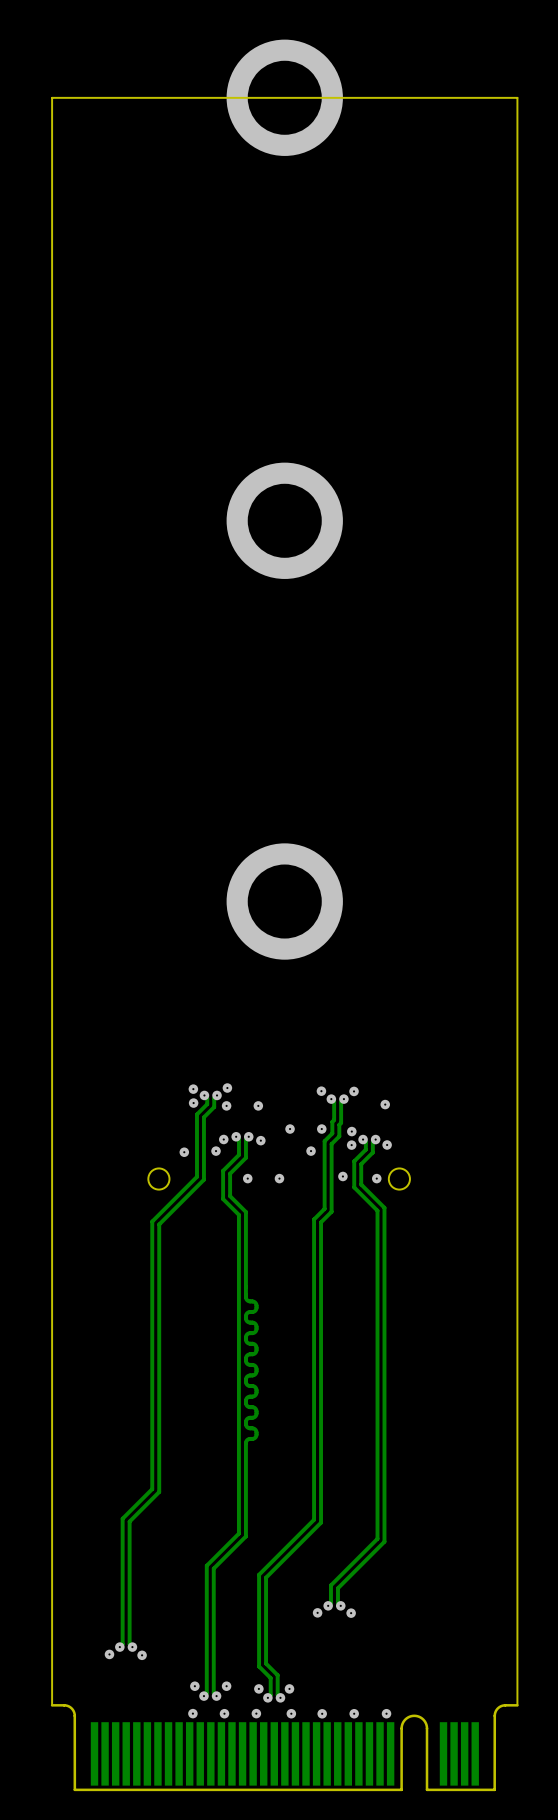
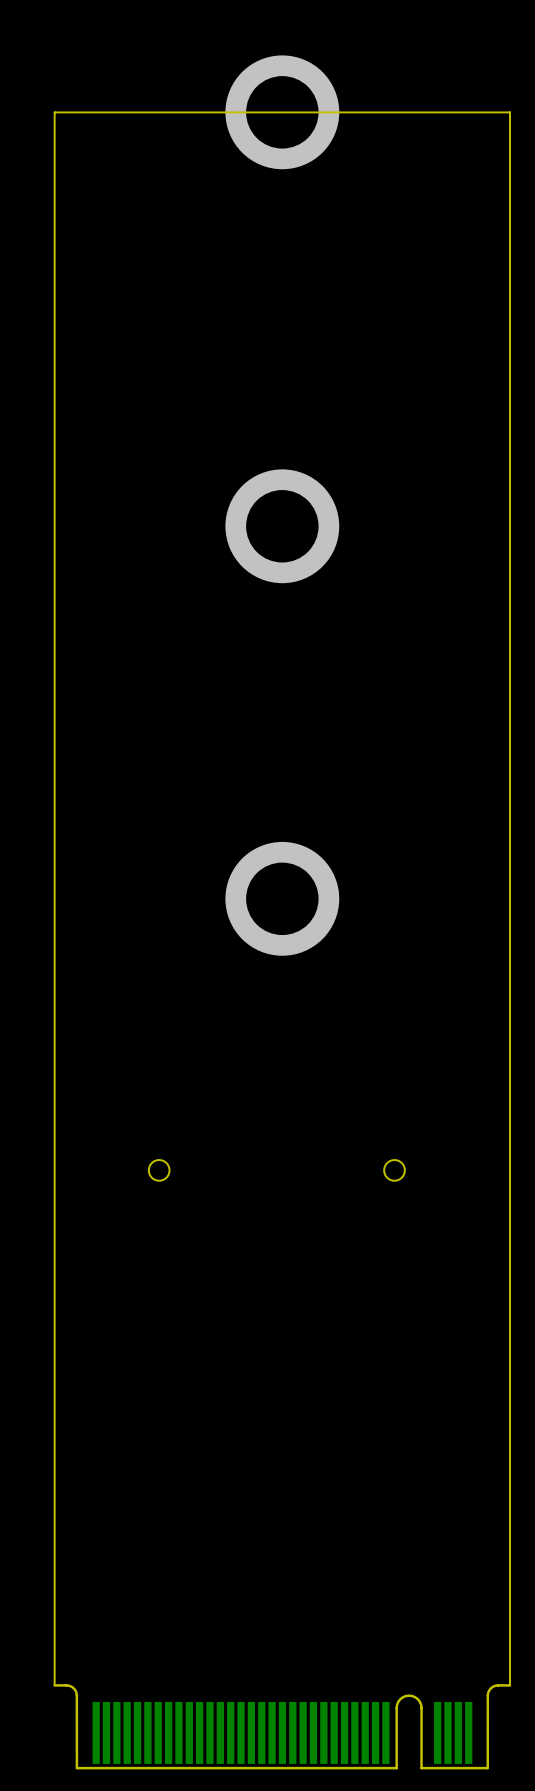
via: (227, 1088) -> none
via: (193, 1089) -> none
via: (321, 1091) -> none
via: (354, 1091) -> none
track: (204, 1095) (207, 1098) (207, 1104) (196, 1114) (196, 1176) (152, 1221) (152, 1489) (122, 1518) (122, 1644) (119, 1647) -> none
via: (204, 1095) -> none
track: (217, 1095) (214, 1098) (214, 1107) (203, 1117) (203, 1179) (159, 1224) (159, 1492) (129, 1521) (129, 1644) (132, 1647) -> none
via: (217, 1095) -> none
track: (331, 1099) (334, 1101) (332, 1133) (324, 1141) (324, 1208) (314, 1219) (314, 1519) (259, 1574) (259, 1666) (270, 1678) (270, 1695) (267, 1697) -> none
via: (331, 1099) -> none
track: (343, 1099) (341, 1101) (339, 1136) (331, 1144) (331, 1211) (321, 1222) (321, 1522) (266, 1577) (266, 1663) (277, 1675) (277, 1695) (280, 1697) -> none
via: (343, 1099) -> none
via: (193, 1103) -> none
via: (385, 1104) -> none
via: (226, 1105) -> none
via: (258, 1105) -> none
via: (290, 1129) -> none
via: (321, 1129) -> none
via: (351, 1131) -> none
track: (236, 1136) (238, 1139) (238, 1154) (223, 1170) (223, 1199) (238, 1214) (238, 1533) (206, 1565) (206, 1693) (203, 1696) -> none
via: (236, 1136) -> none
track: (248, 1136) (245, 1139) (245, 1157) (230, 1173) (230, 1196) (245, 1212) (245, 1297) (256, 1305) (255, 1310) (248, 1312) (245, 1316) (247, 1321) (254, 1323) (256, 1326) (255, 1331) (248, 1333) (245, 1337) (247, 1342) (254, 1344) (256, 1347) (255, 1353) (248, 1354) (245, 1358) (247, 1363) (254, 1365) (256, 1368) (255, 1374) (248, 1376) (245, 1379) (247, 1384) (256, 1389) (255, 1394) (247, 1397) (245, 1402) (248, 1406) (255, 1408) (256, 1414) (254, 1417) (247, 1419) (245, 1424) (248, 1427) (255, 1429) (256, 1434) (254, 1438) (248, 1439) (245, 1442) (245, 1536) (213, 1568) (213, 1693) (216, 1695) -> none
via: (248, 1136) -> none
via: (223, 1139) -> none
track: (363, 1139) (365, 1142) (365, 1149) (354, 1161) (354, 1187) (377, 1210) (377, 1538) (330, 1585) (330, 1603) (328, 1605) -> none
via: (363, 1139) -> none
track: (375, 1139) (372, 1142) (372, 1152) (361, 1164) (361, 1184) (384, 1207) (384, 1541) (337, 1588) (337, 1603) (340, 1605) -> none
via: (375, 1139) -> none
via: (260, 1140) -> none
via: (387, 1144) -> none
via: (351, 1145) -> none
via: (216, 1151) -> none
via: (311, 1151) -> none
via: (184, 1152) -> none
via: (342, 1176) -> none
via: (247, 1178) -> none
via: (279, 1178) -> none
via: (376, 1178) -> none
via: (328, 1605) -> none
via: (340, 1605) -> none
via: (317, 1612) -> none
via: (351, 1613) -> none
via: (119, 1647) -> none
via: (132, 1647) -> none
via: (109, 1654) -> none
via: (142, 1655) -> none
via: (194, 1686) -> none
via: (226, 1686) -> none
via: (258, 1688) -> none
via: (289, 1688) -> none
via: (203, 1696) -> none
via: (216, 1696) -> none
via: (267, 1697) -> none
via: (280, 1697) -> none
via: (192, 1713) -> none
via: (224, 1713) -> none
via: (256, 1713) -> none
via: (291, 1713) -> none
via: (322, 1713) -> none
via: (354, 1713) -> none
via: (386, 1713) -> none

